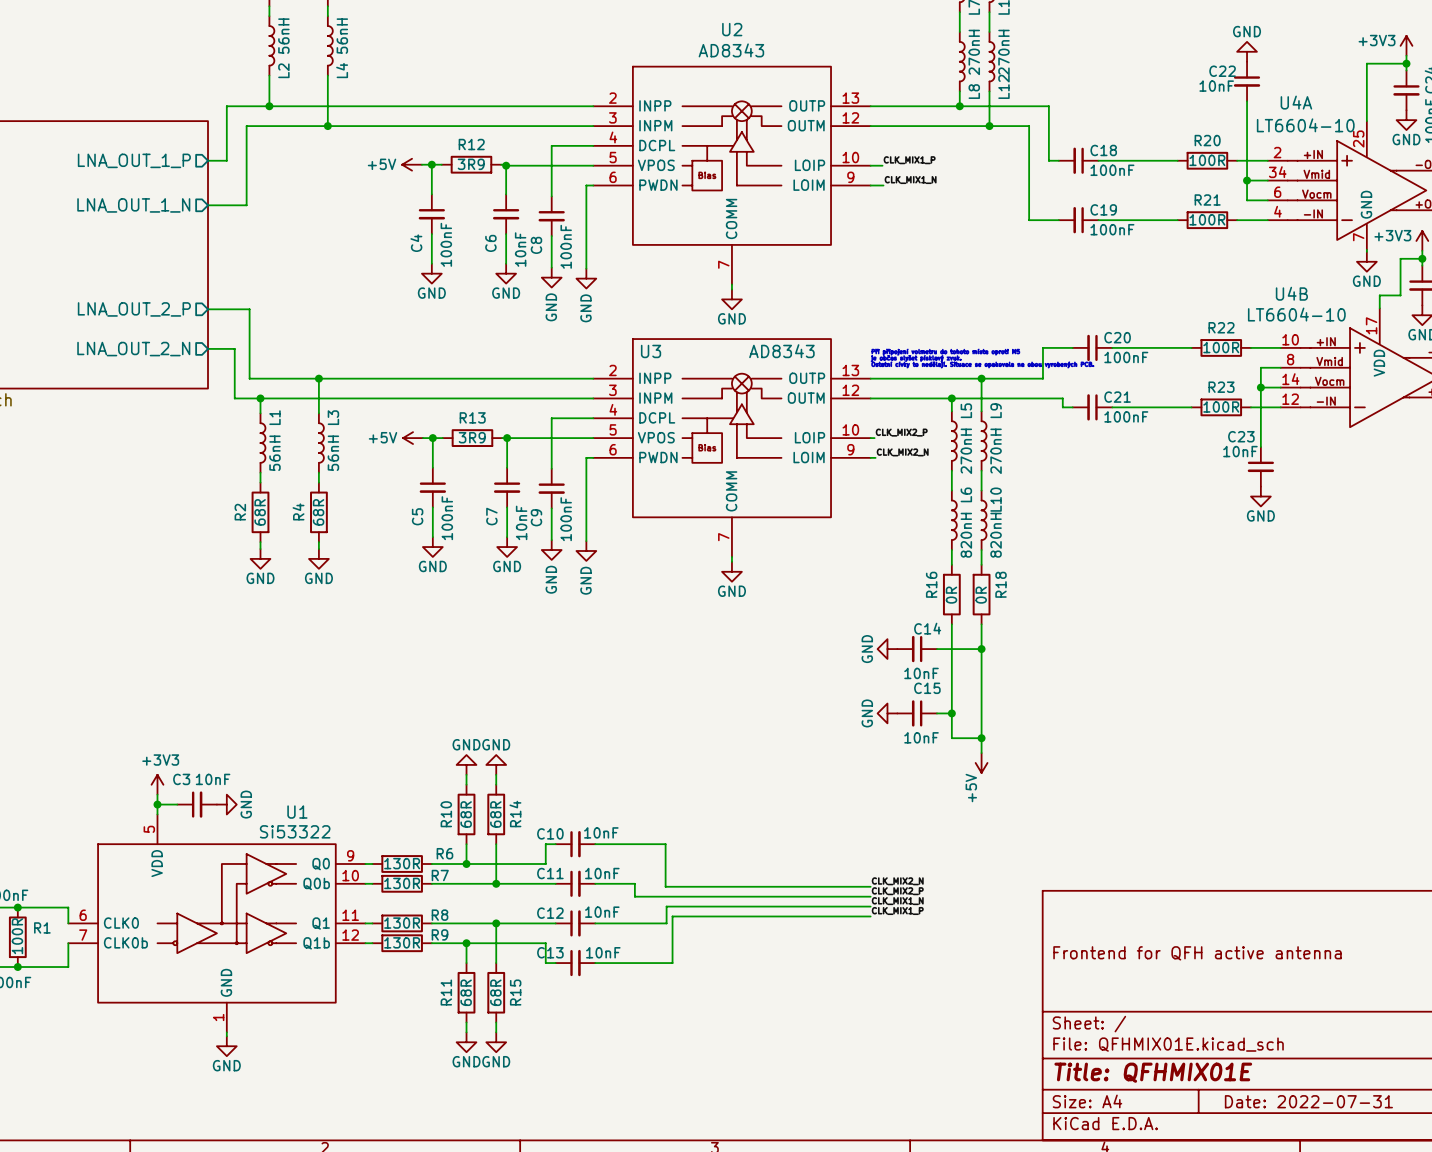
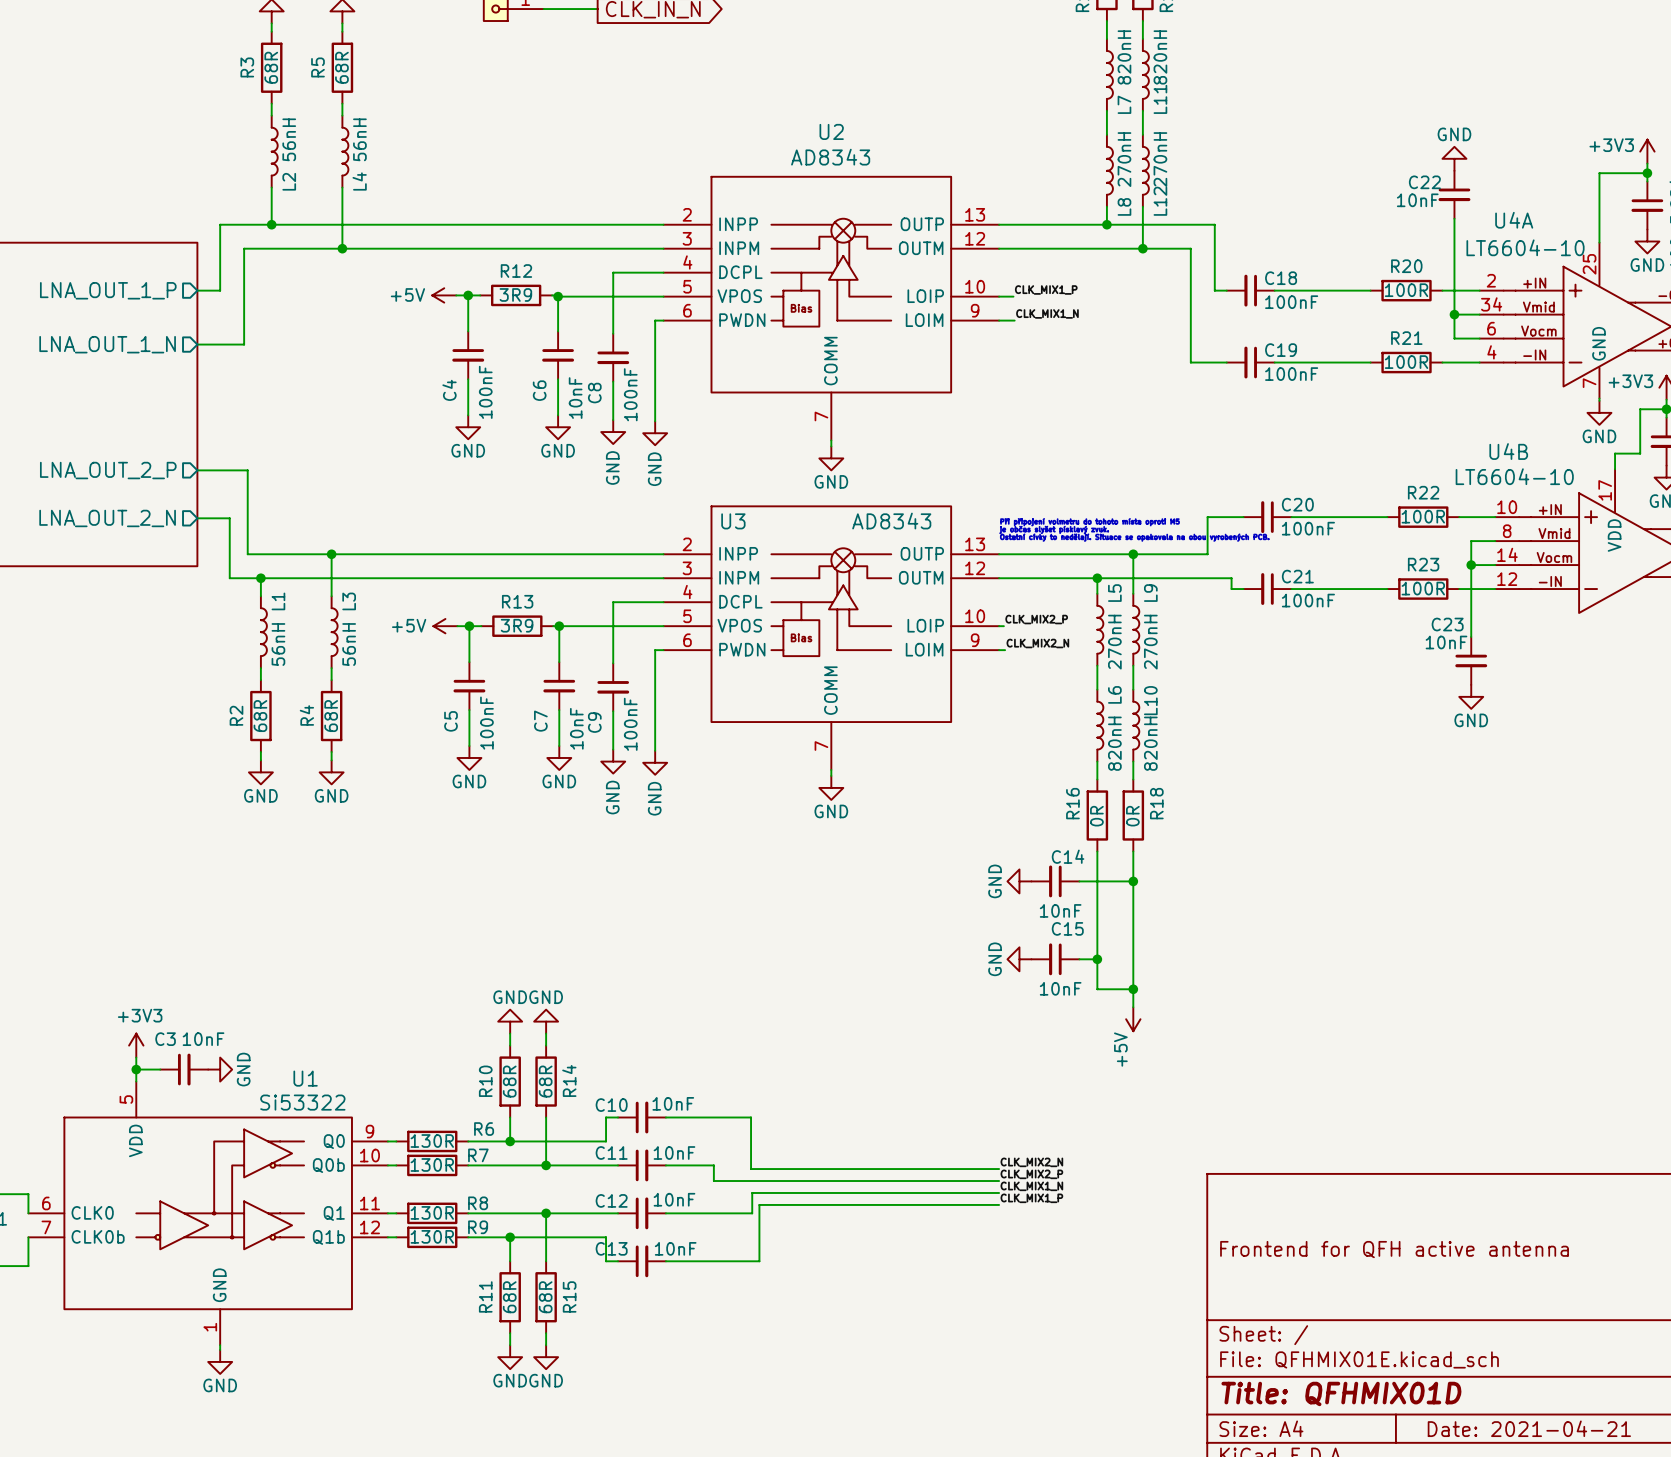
title block: Title: QFHMIX01E (1153, 1072) -> Title: QFHMIX01D (1341, 1393)
title block: Date: 2022-07-31 (1308, 1101) -> Date: 2021-04-21 (1529, 1428)

